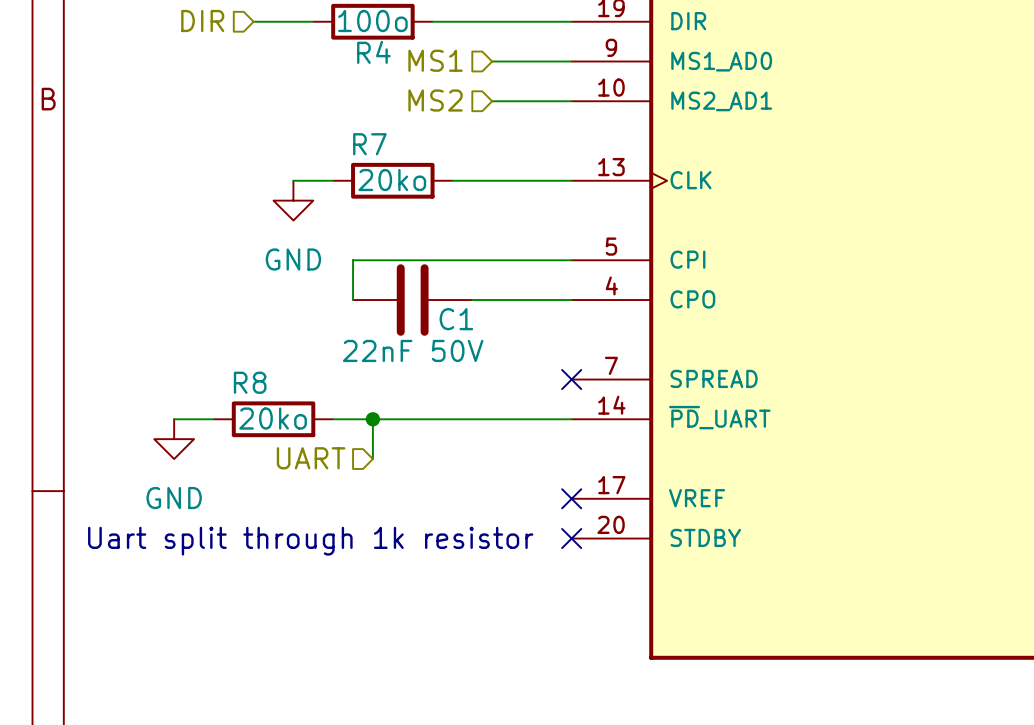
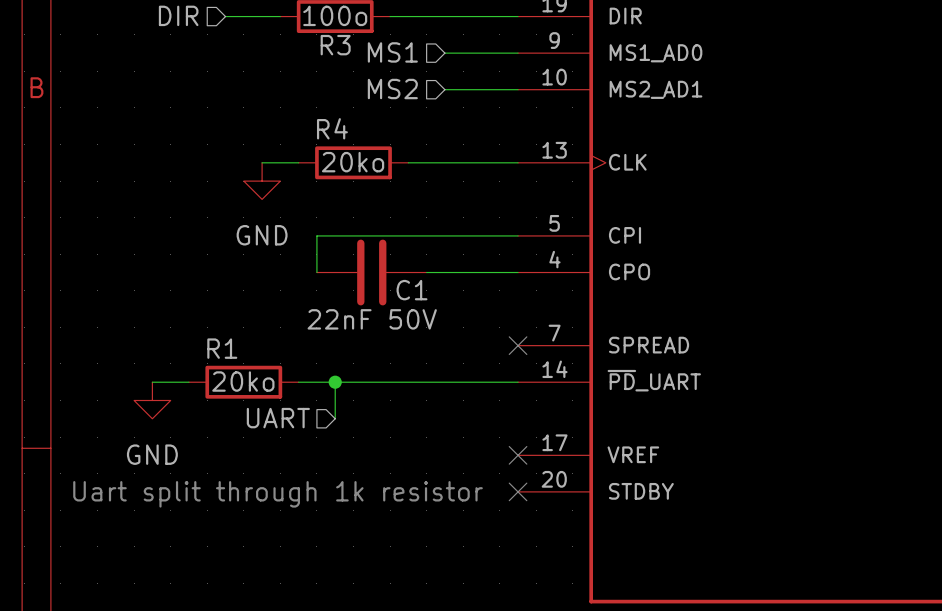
R4 name: R4 (373, 52) -> R3 (335, 45)
R7 name: R7 (369, 144) -> R4 (332, 128)
R8 name: R8 (250, 382) -> R1 (222, 348)

